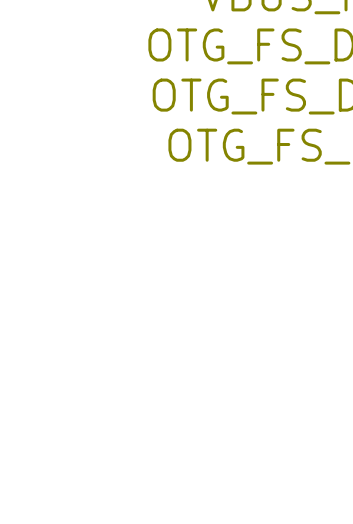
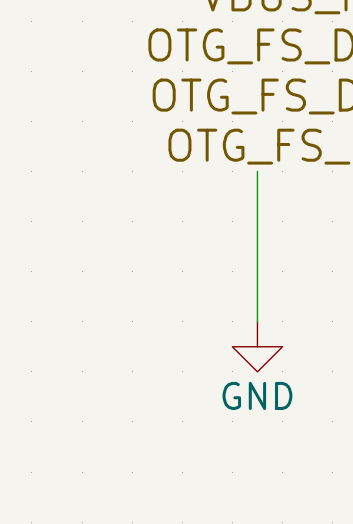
wire: none -> (257, 171) (257, 321)
power symbol: none -> GND (257, 346)

